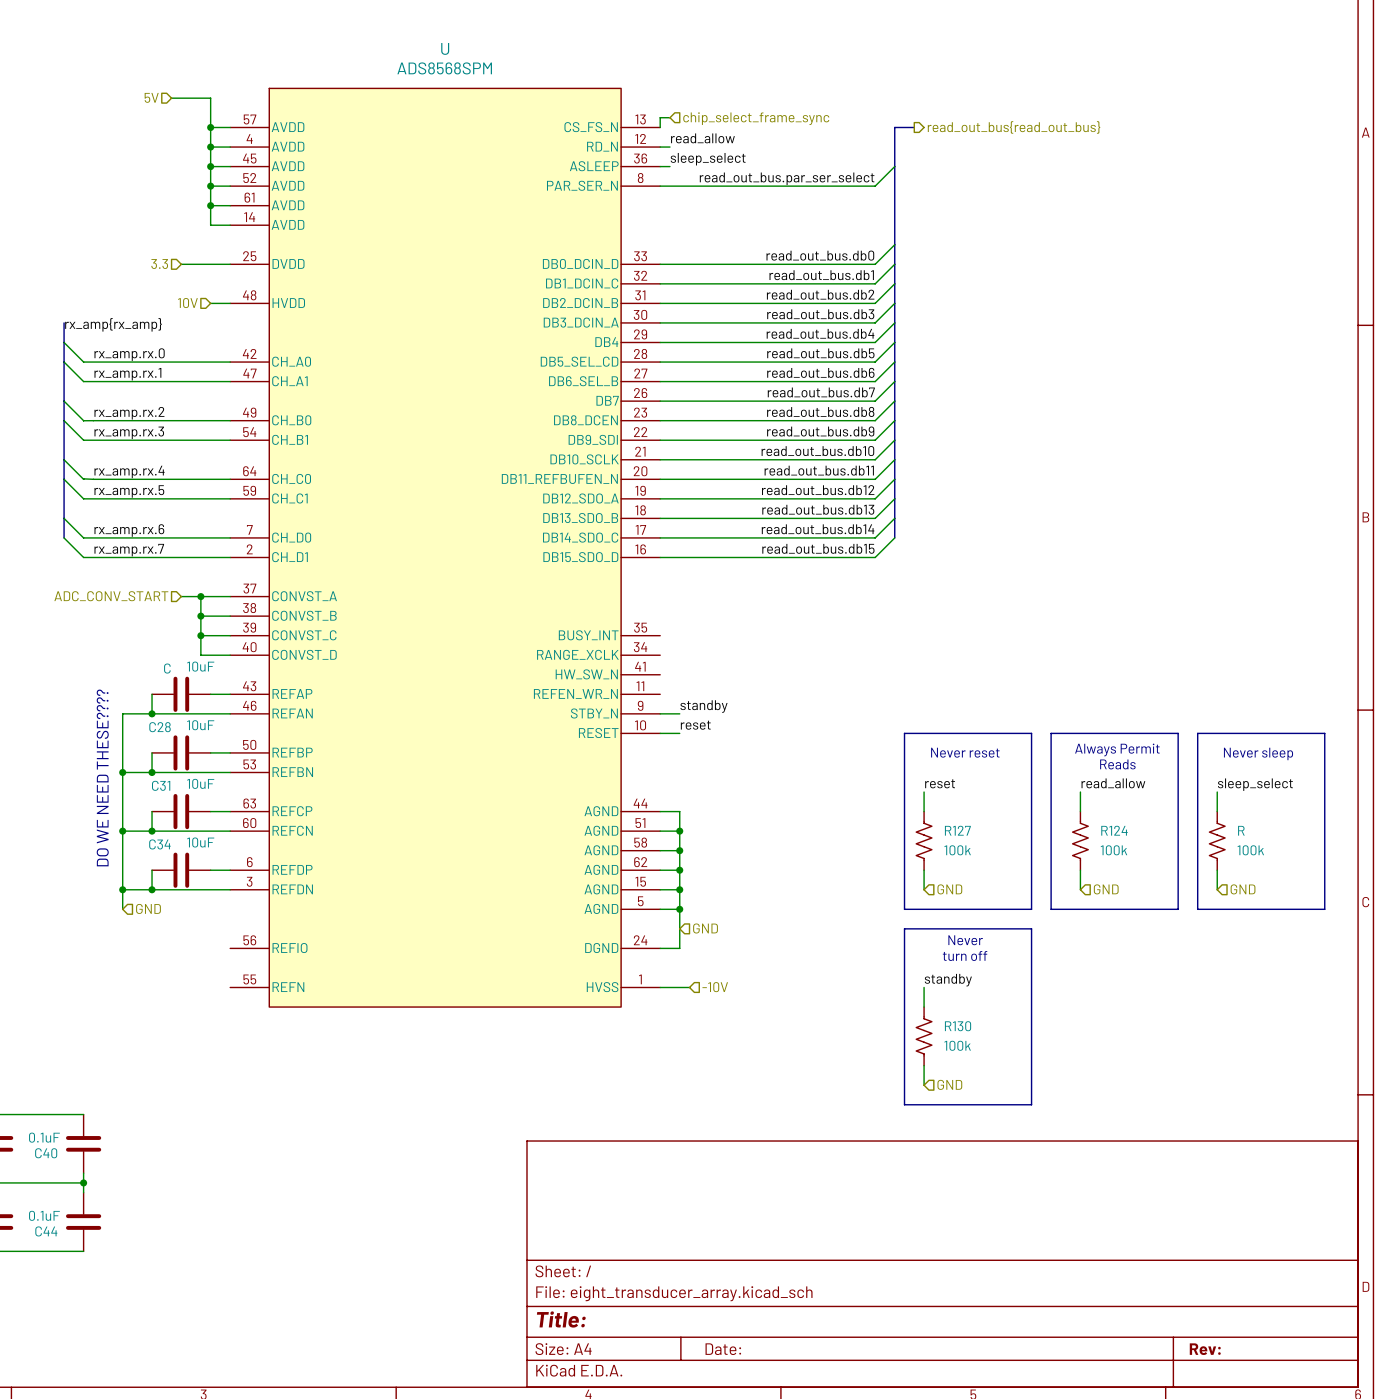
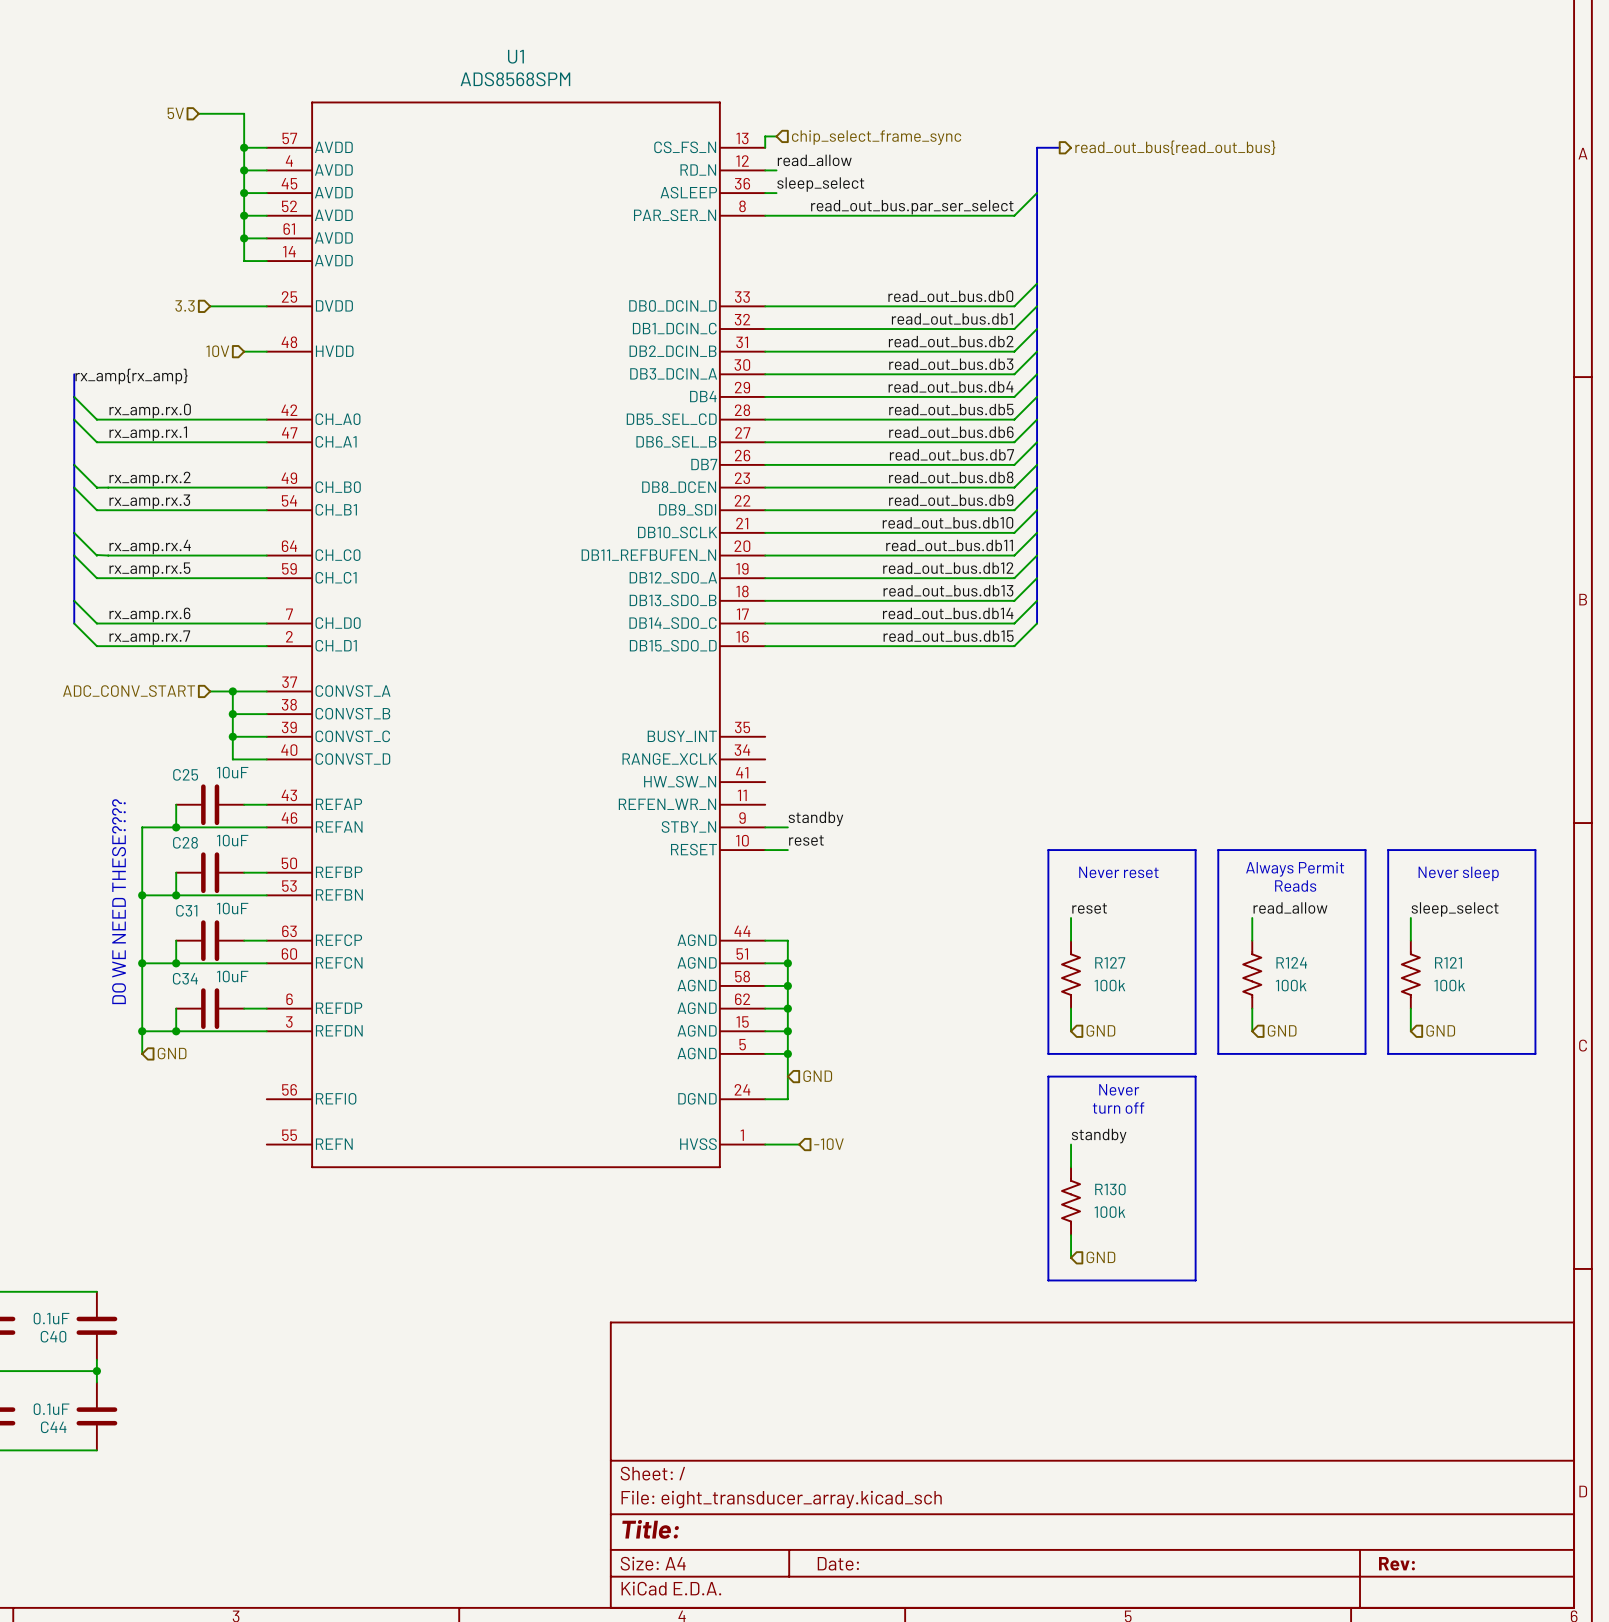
U: ADS8568SPM (445, 547) -> none
U1: none -> ADS8568SPM (516, 634)
C name: C (167, 668) -> C25 (185, 774)
R name: R (1241, 830) -> R121 (1448, 962)

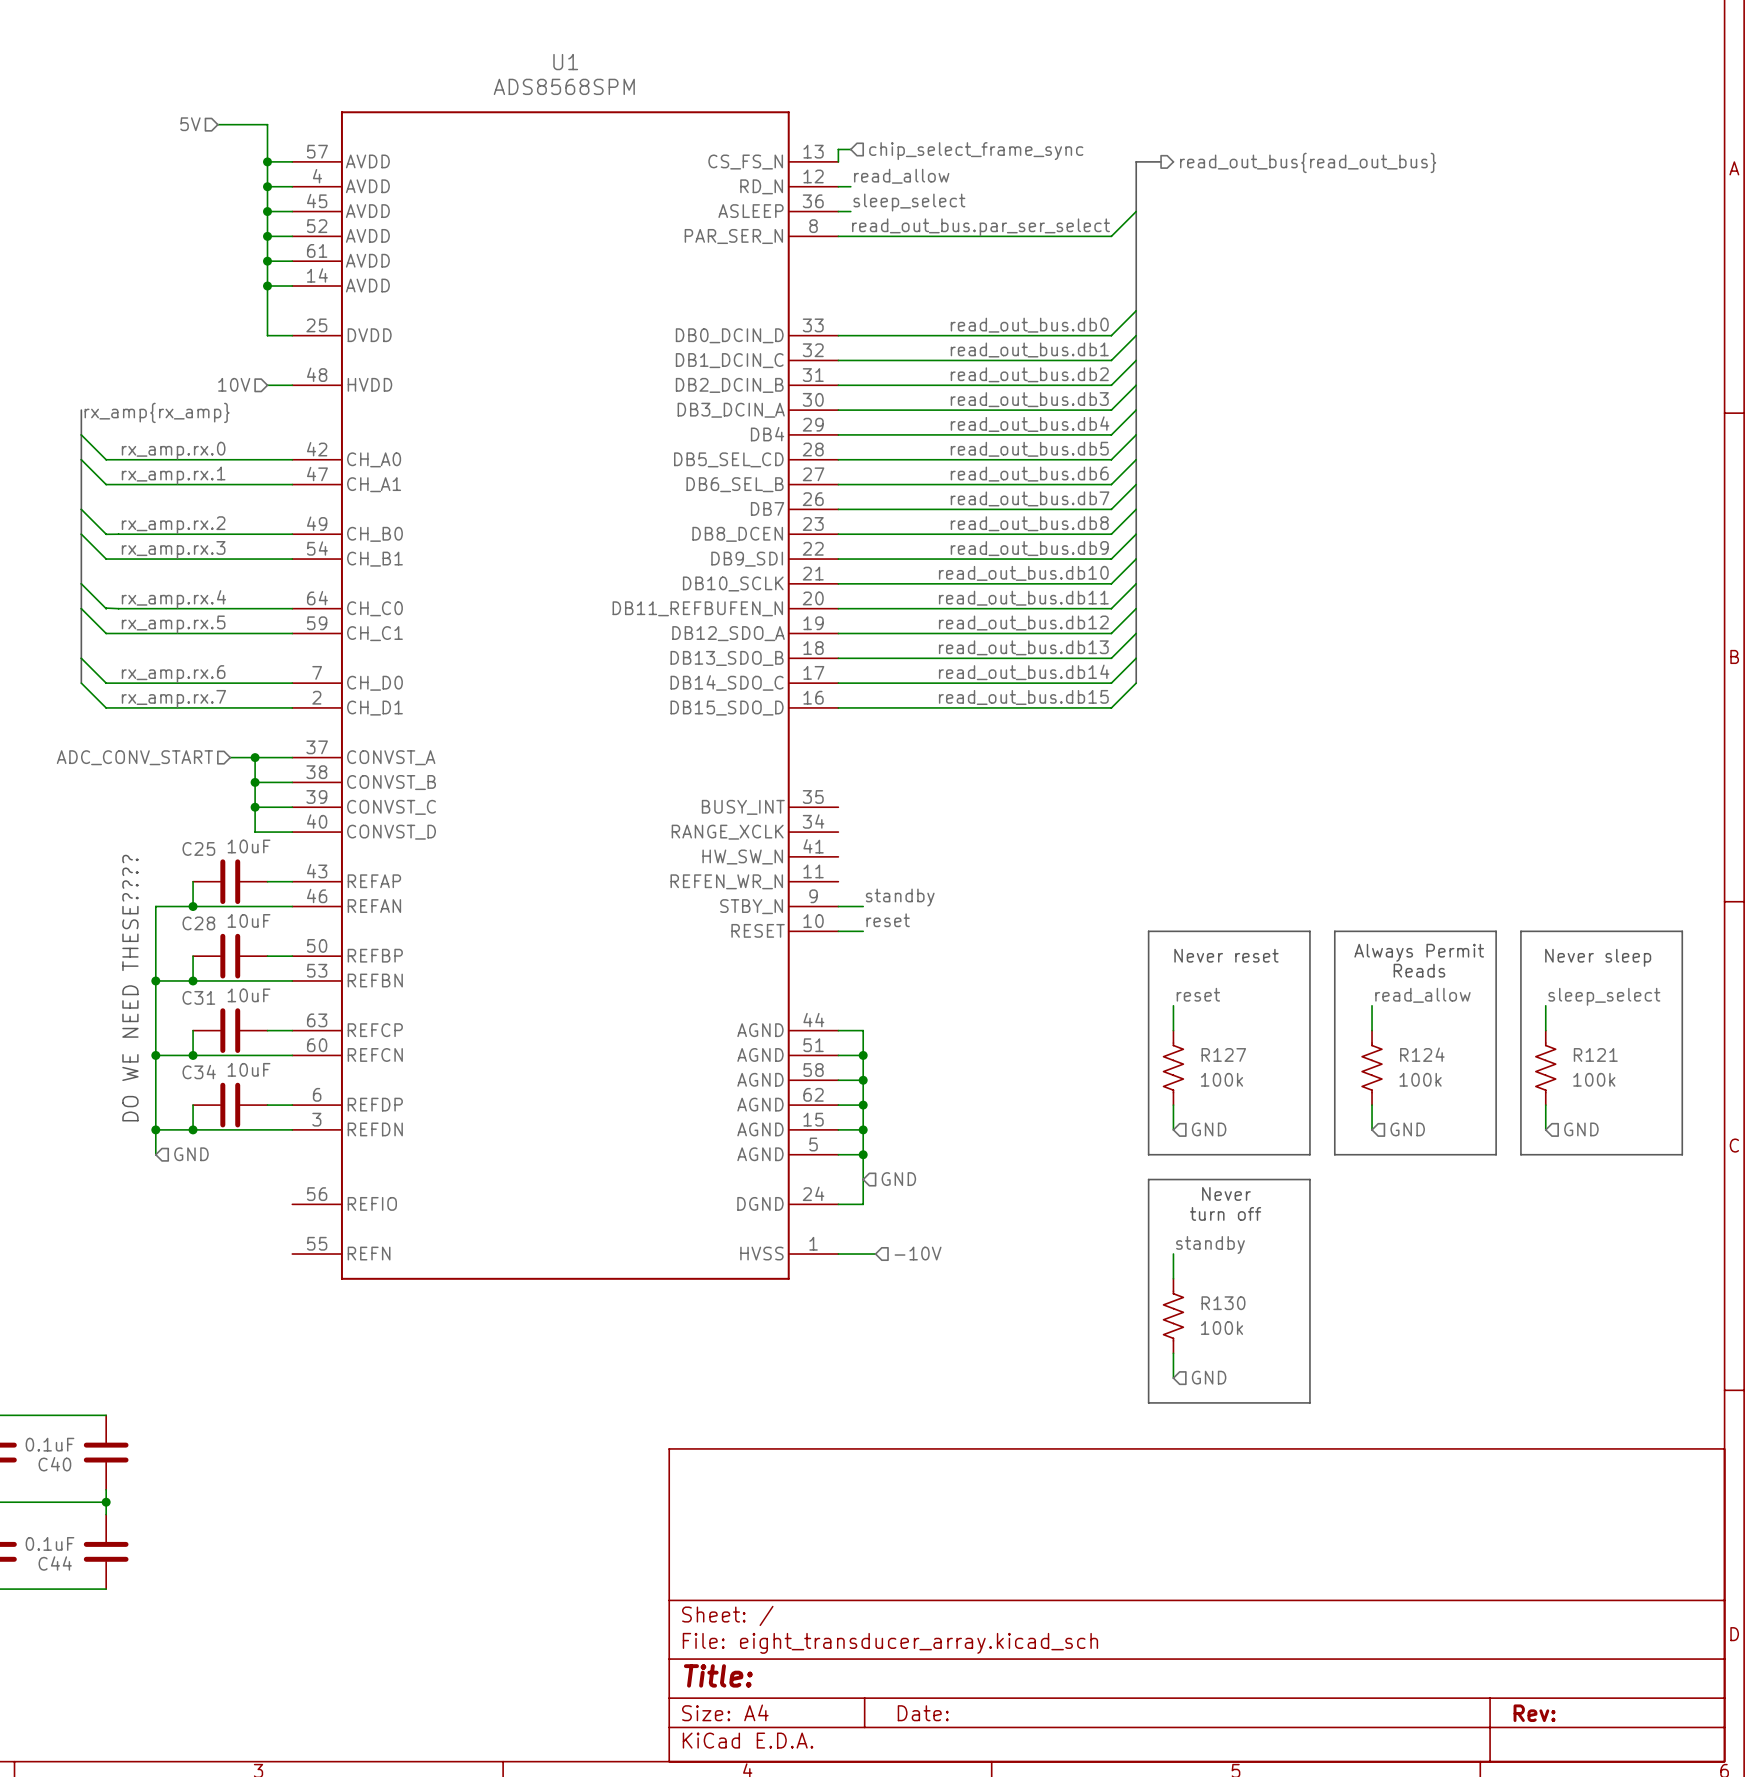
junction: none -> (267, 286)
hierarchical label: 3.3 (185, 305) -> none
wire: (210, 306) (244, 306) -> (267, 286) (267, 335)

